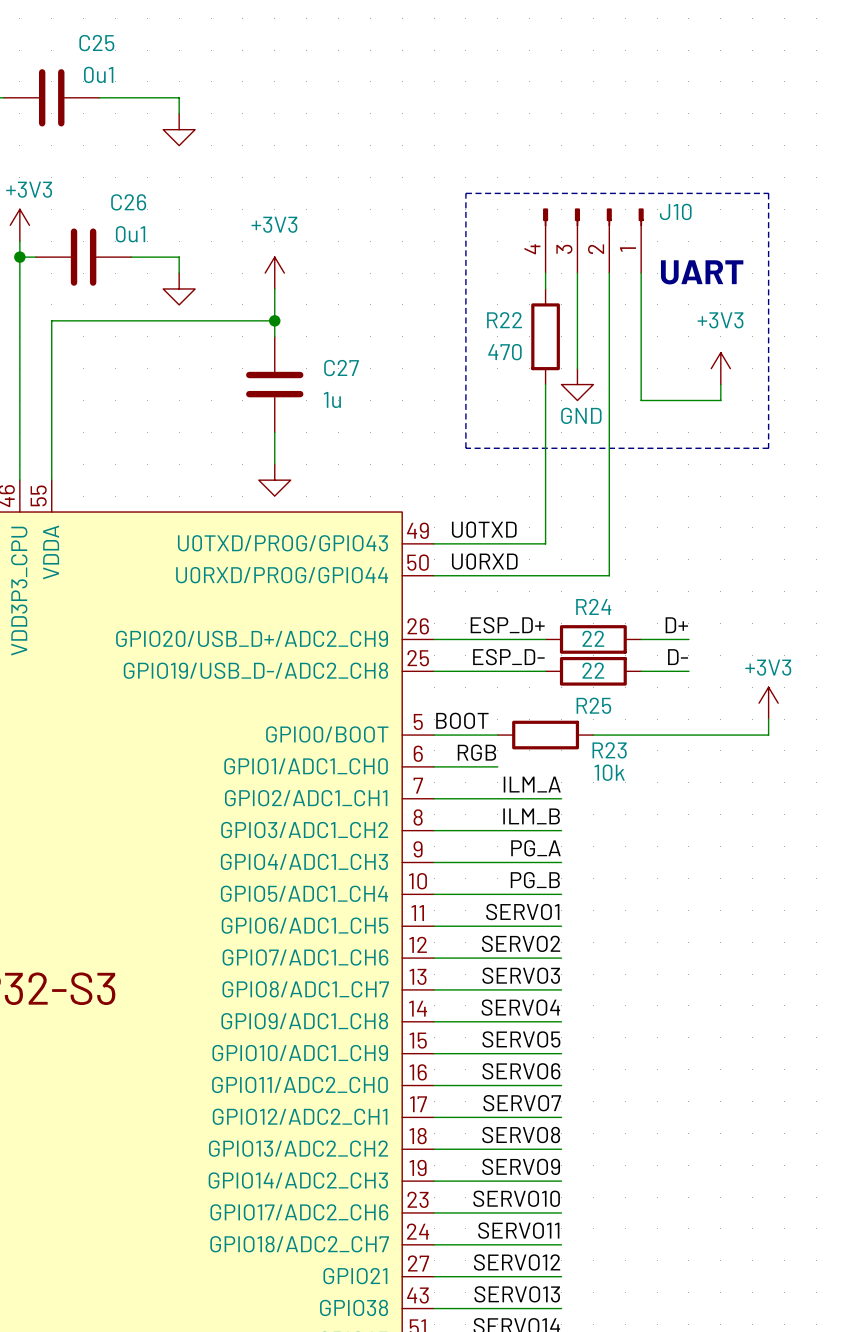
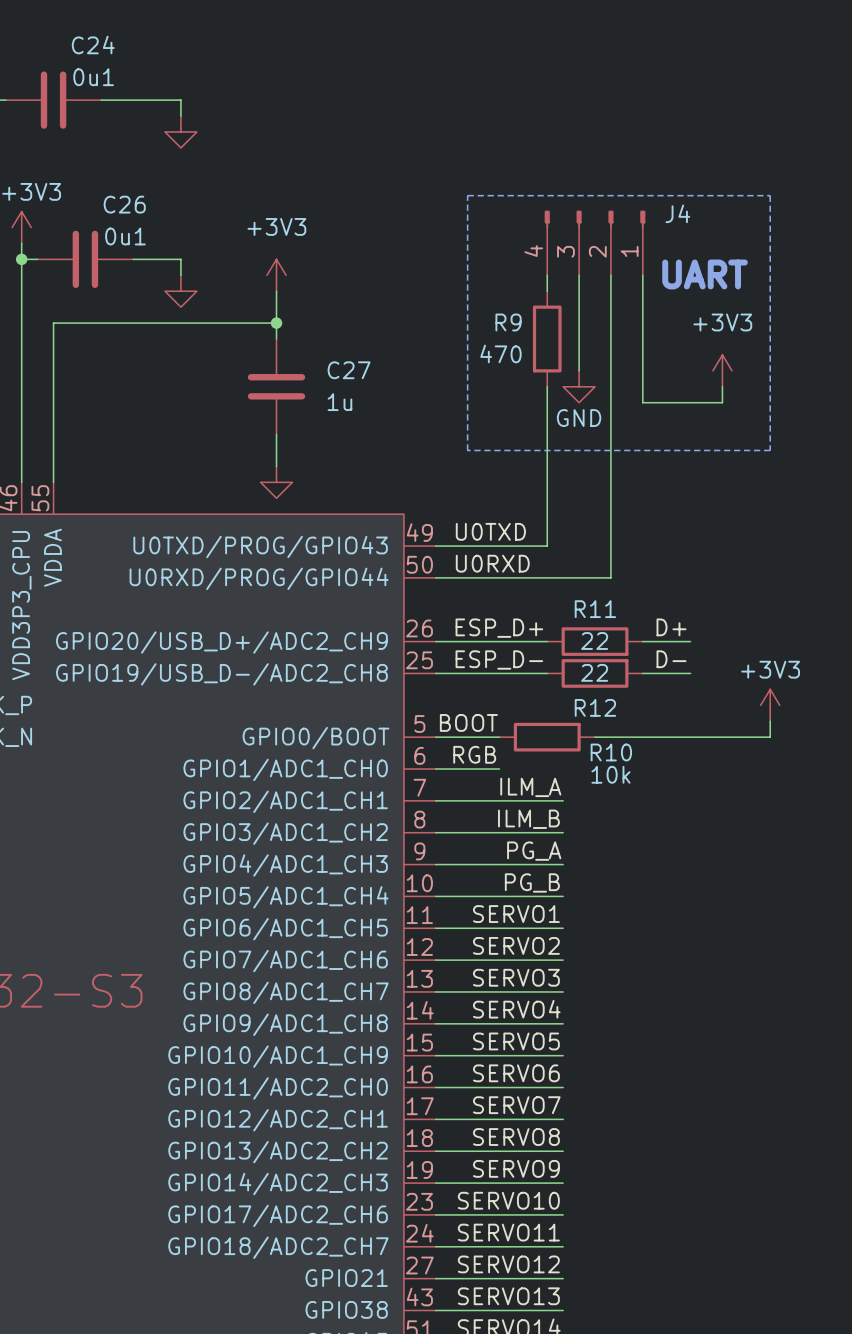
C25 name: C25 (96, 43) -> C24 (93, 44)
J10 name: J10 (675, 211) -> J4 (677, 213)
R22 name: R22 (504, 320) -> R9 (508, 322)
R24 name: R24 (593, 606) -> R11 (595, 609)
R25 name: R25 (593, 705) -> R12 (595, 707)
R23 name: R23 (609, 750) -> R10 (611, 752)

